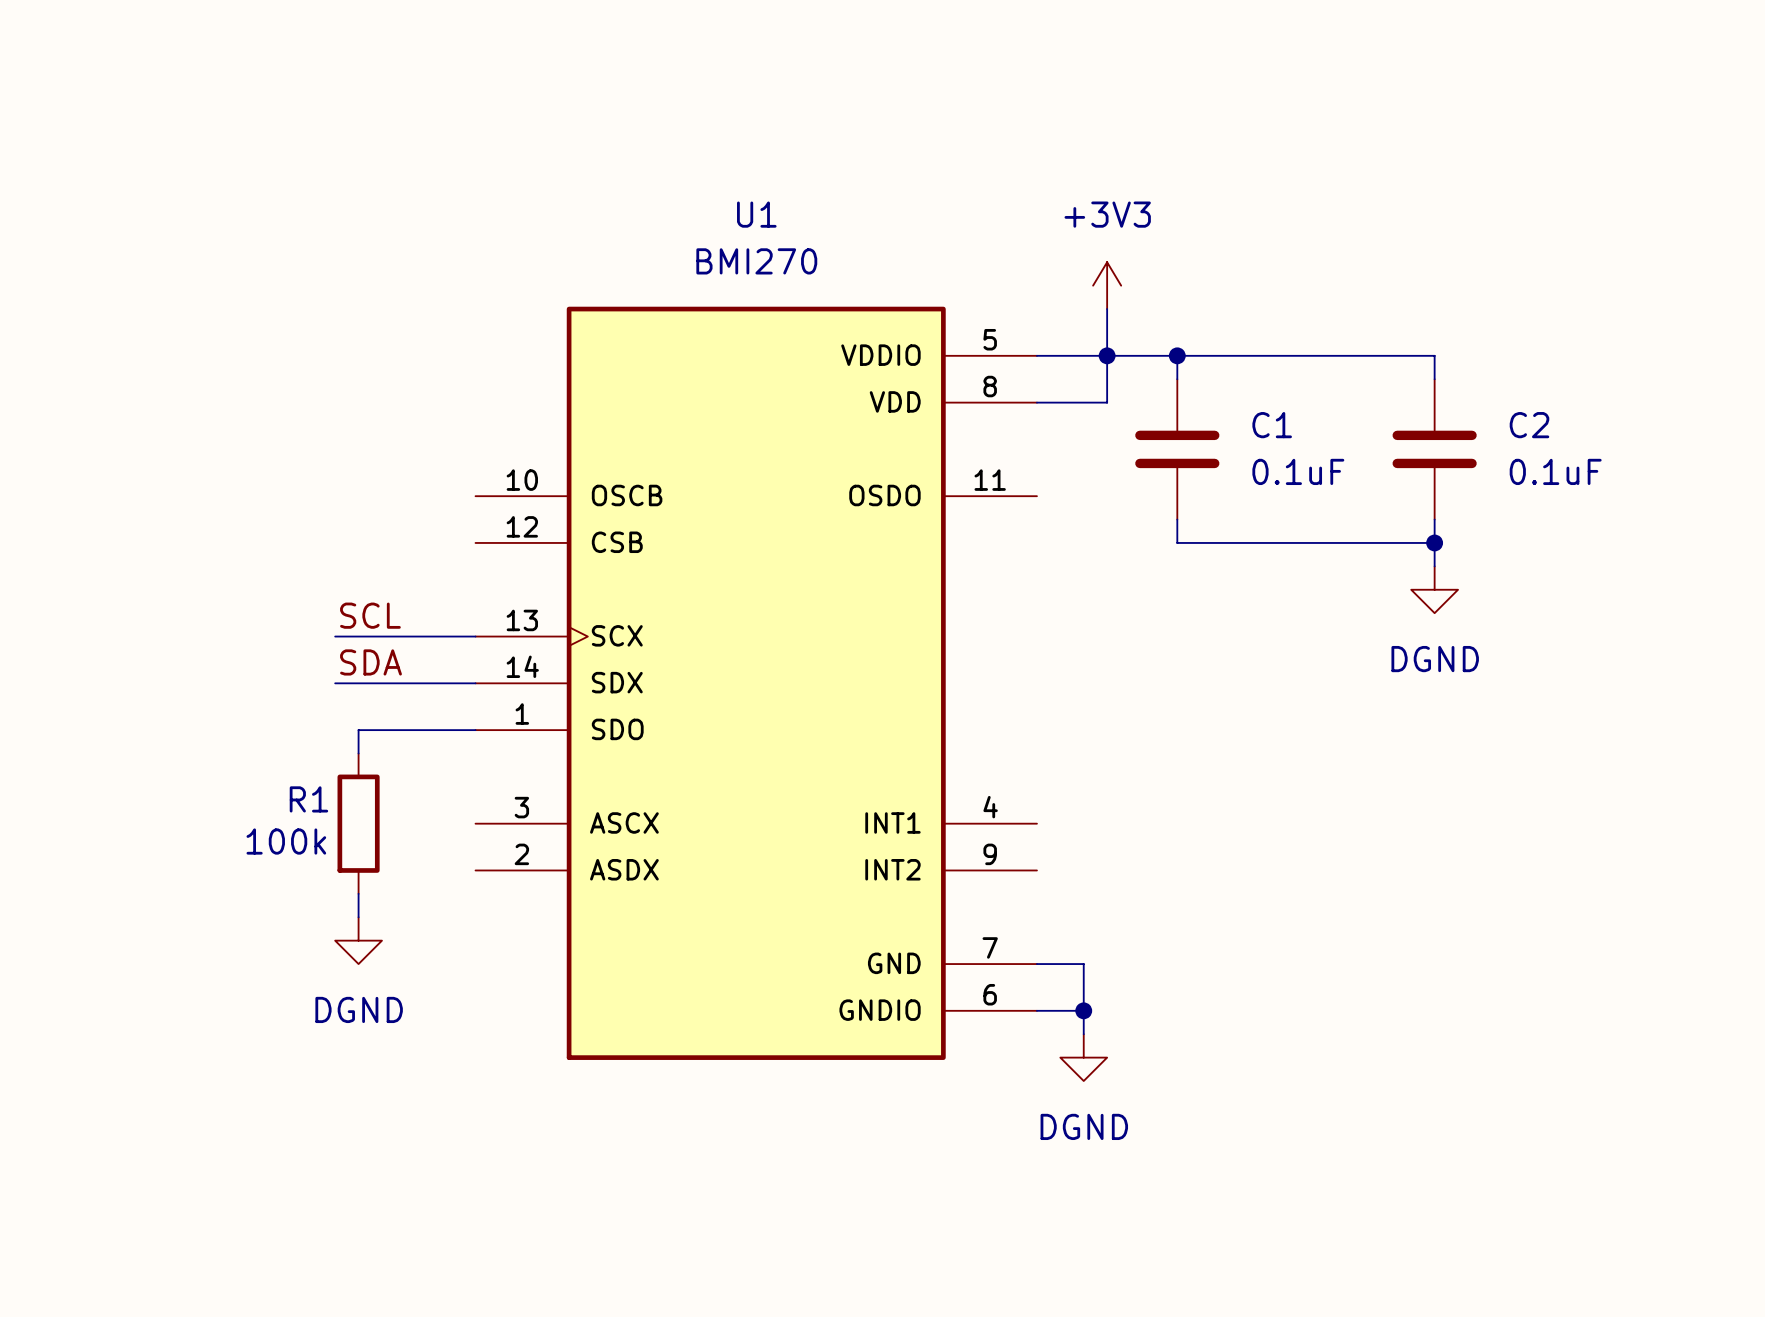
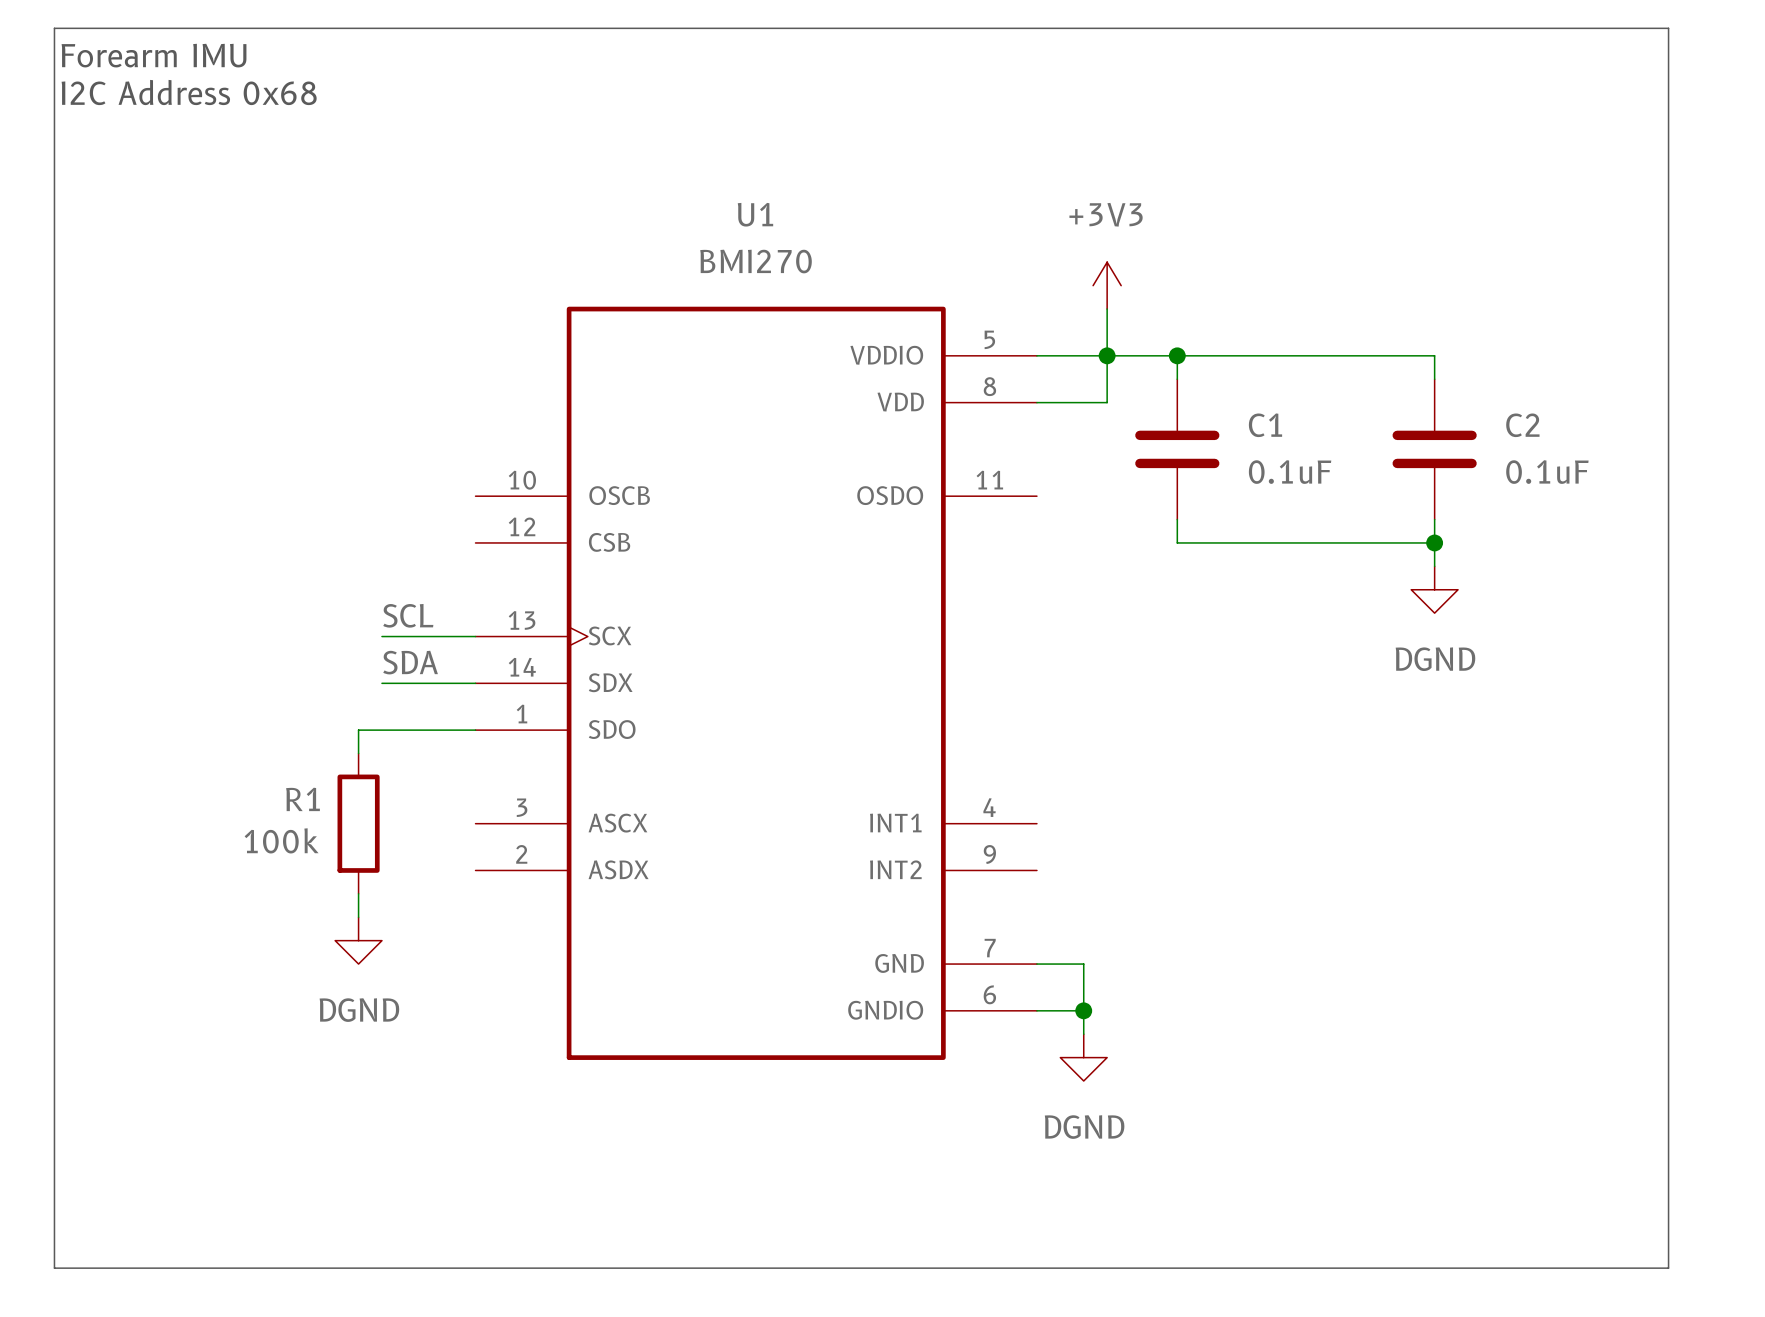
line: none -> (54, 28) (1668, 28) (1668, 1268) (54, 1268) (54, 28)
text: none -> Forearm IMU (154, 55)
text: none -> I2C Address 0x68 (189, 92)
label position: SCL (370, 615) -> SCL (408, 615)
wire: (335, 636) (381, 636) -> none
label position: SDA (371, 662) -> SDA (410, 662)
wire: (335, 683) (381, 683) -> none

